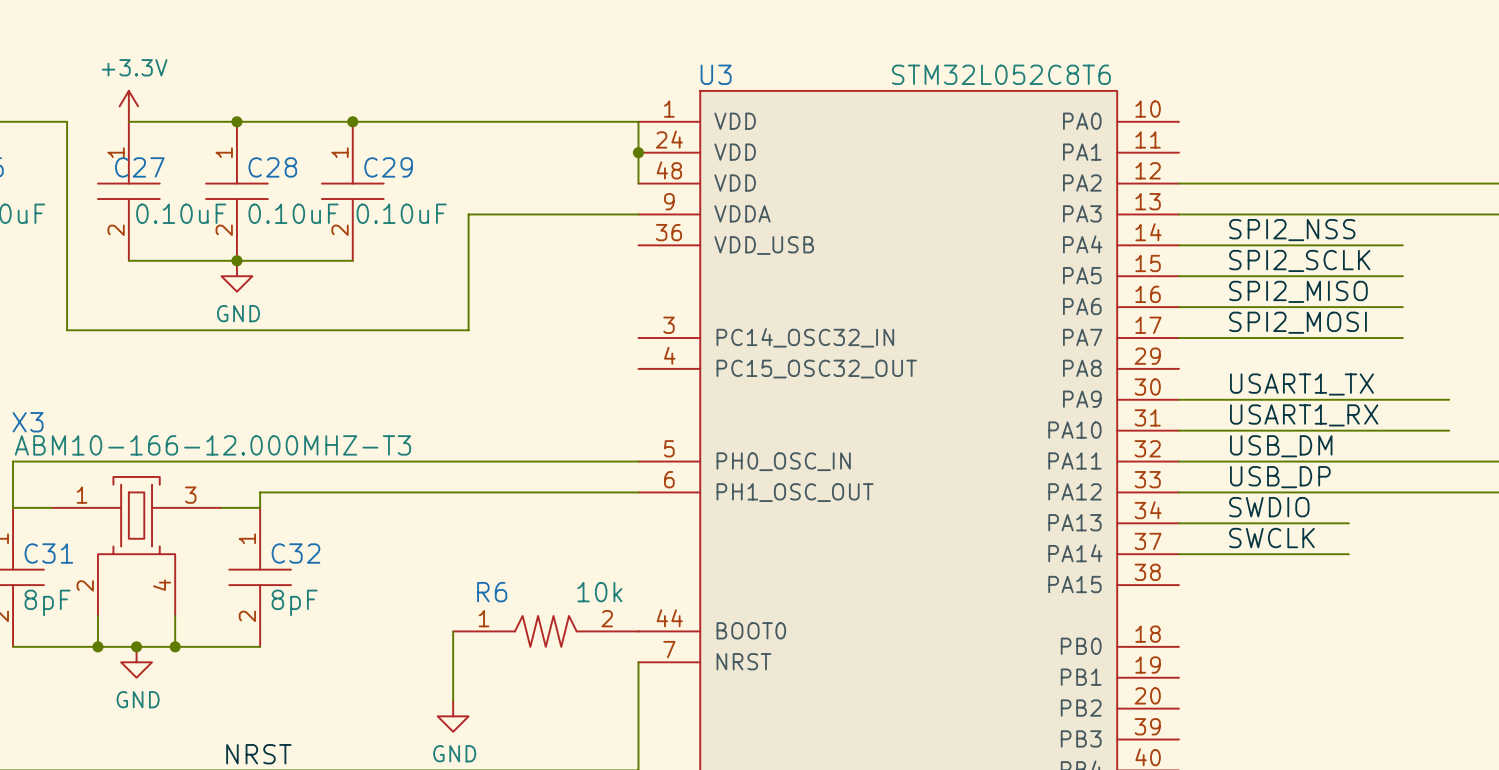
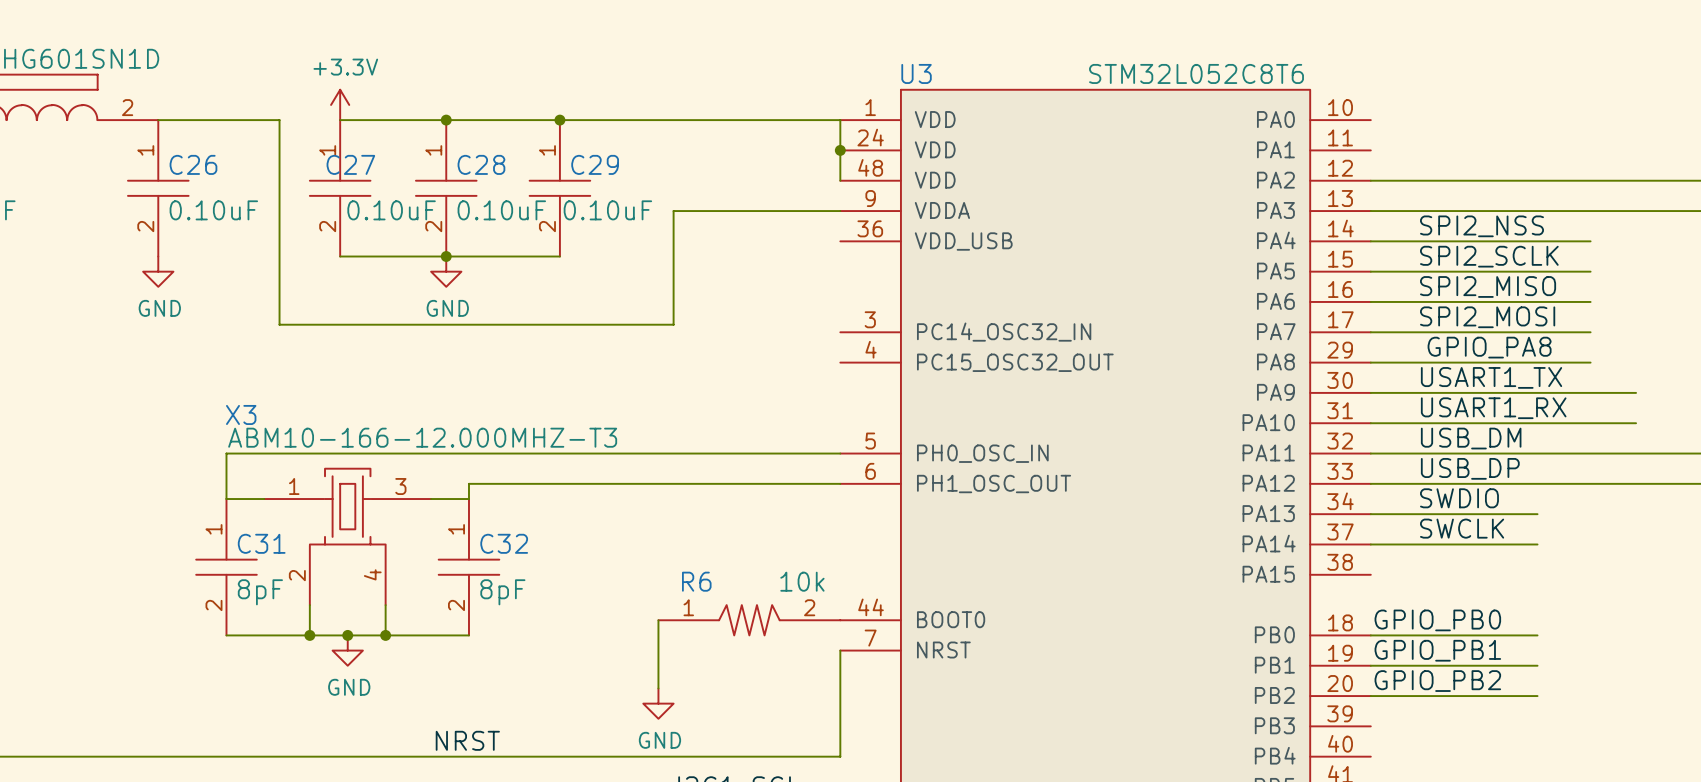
label: none -> GPIO_PA8 (1489, 347)
wire: none -> (1370, 362) (1590, 362)
label: none -> GPIO_PB0 (1437, 620)
wire: none -> (1370, 635) (1537, 635)
label: none -> GPIO_PB1 (1437, 650)
wire: none -> (1370, 665) (1537, 665)
label: none -> GPIO_PB2 (1437, 681)
wire: none -> (1370, 696) (1537, 696)

